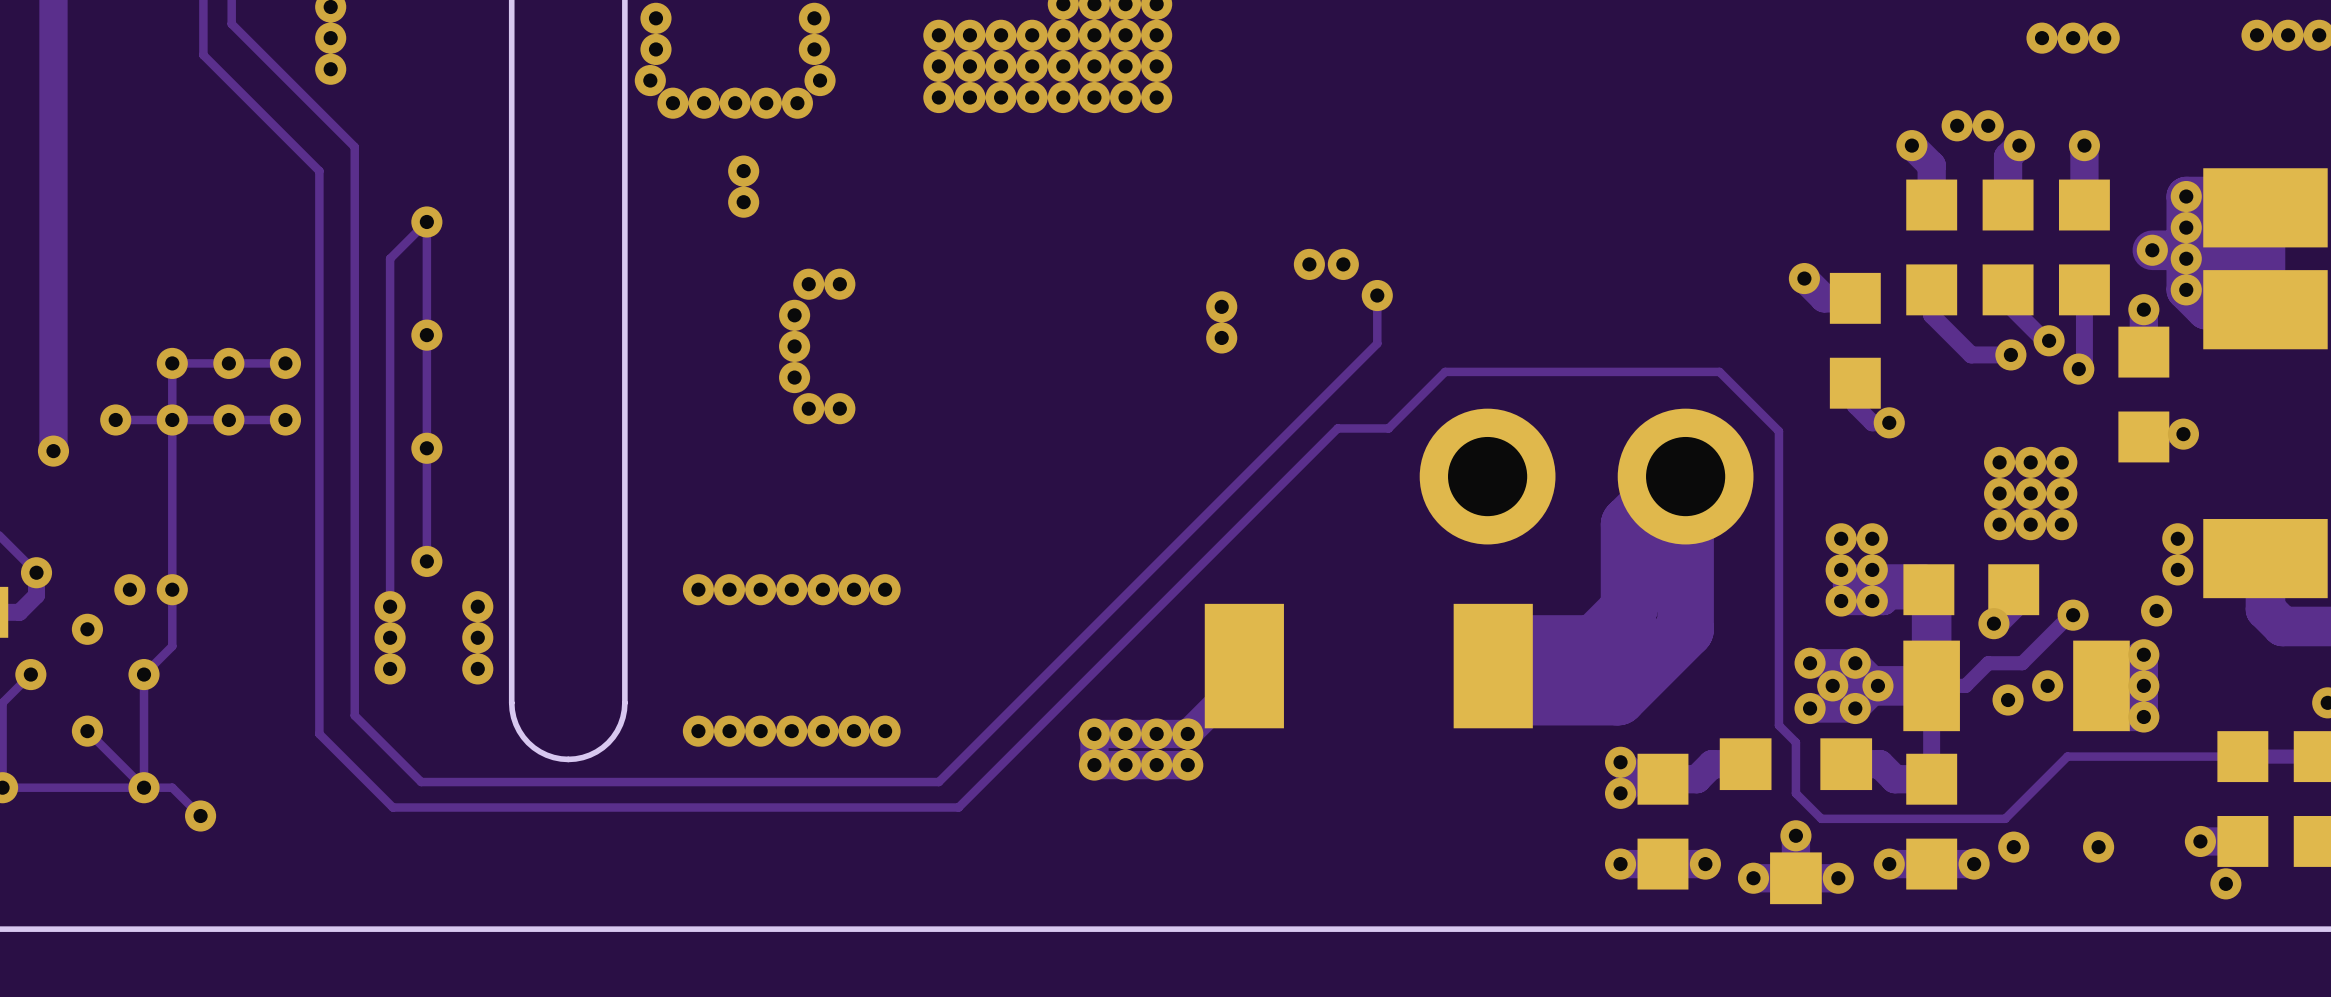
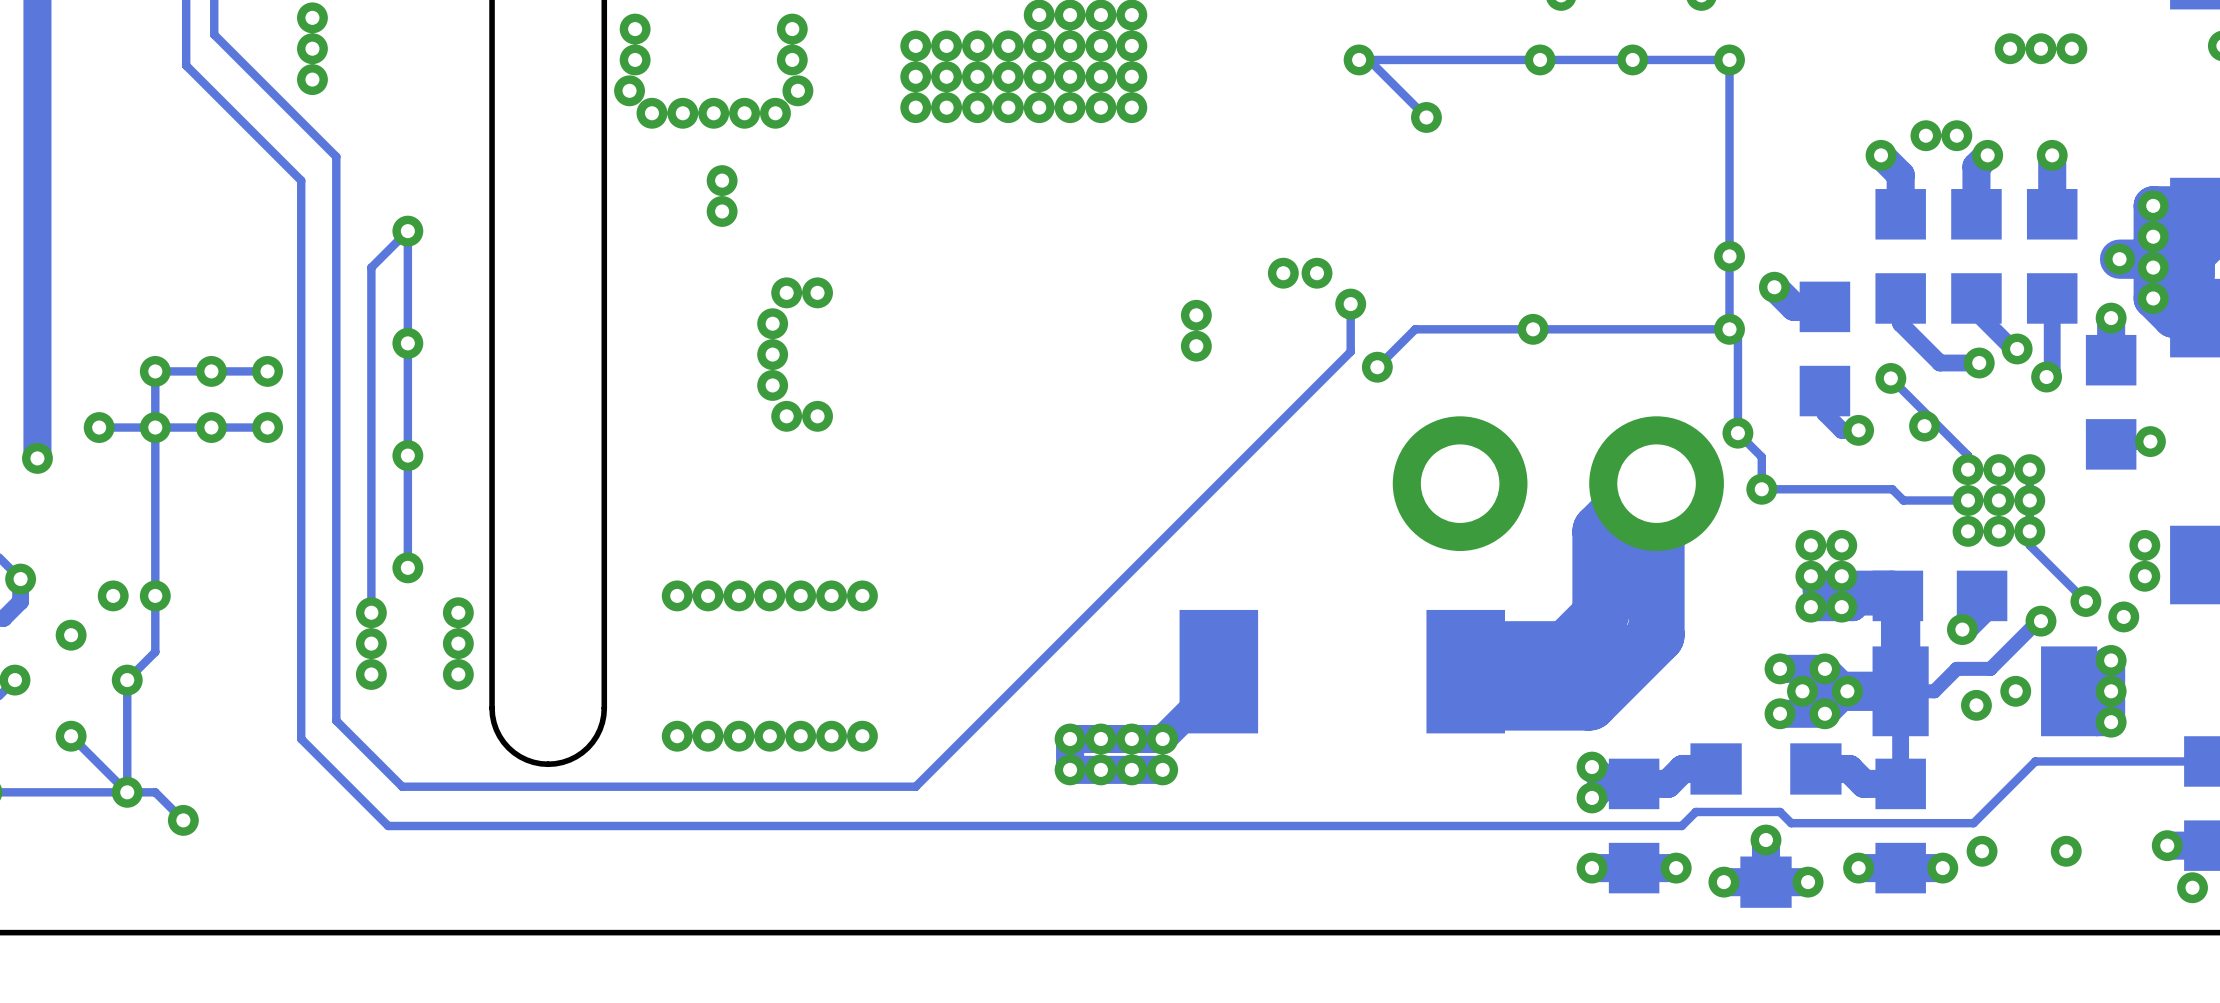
track: none -> (1359, 59) (1729, 59) (1729, 329)
via: none -> (1359, 59)
track: none -> (1368, 59) (1426, 117)
via: none -> (1540, 59)
via: none -> (1632, 59)
via: none -> (1729, 59)
via: none -> (1426, 117)
via: none -> (1729, 256)
via: none -> (1533, 329)
track: none -> (1729, 329) (1737, 337) (1737, 433) (1761, 457) (1761, 489) (1892, 489) (1903, 500) (1968, 500)
track: none -> (1729, 329) (1415, 329) (1377, 367)
via: none -> (1729, 329)
via: none -> (1377, 367)
track: none -> (1890, 378) (1968, 455) (1968, 469)
via: none -> (1890, 378)
via: none -> (1924, 426)
via: none -> (1737, 433)
track: none -> (2029, 469) (2029, 545) (2085, 601)
via: none -> (1761, 489)
via: none -> (2085, 601)
track: (1810, 807) (1795, 793) (1795, 742) (1778, 725) (1778, 431) (1719, 371) (1445, 371) (1388, 428) (1337, 428) (958, 807) (392, 807) -> (1780, 811) (1695, 811) (1681, 826) (388, 826) (374, 811)

